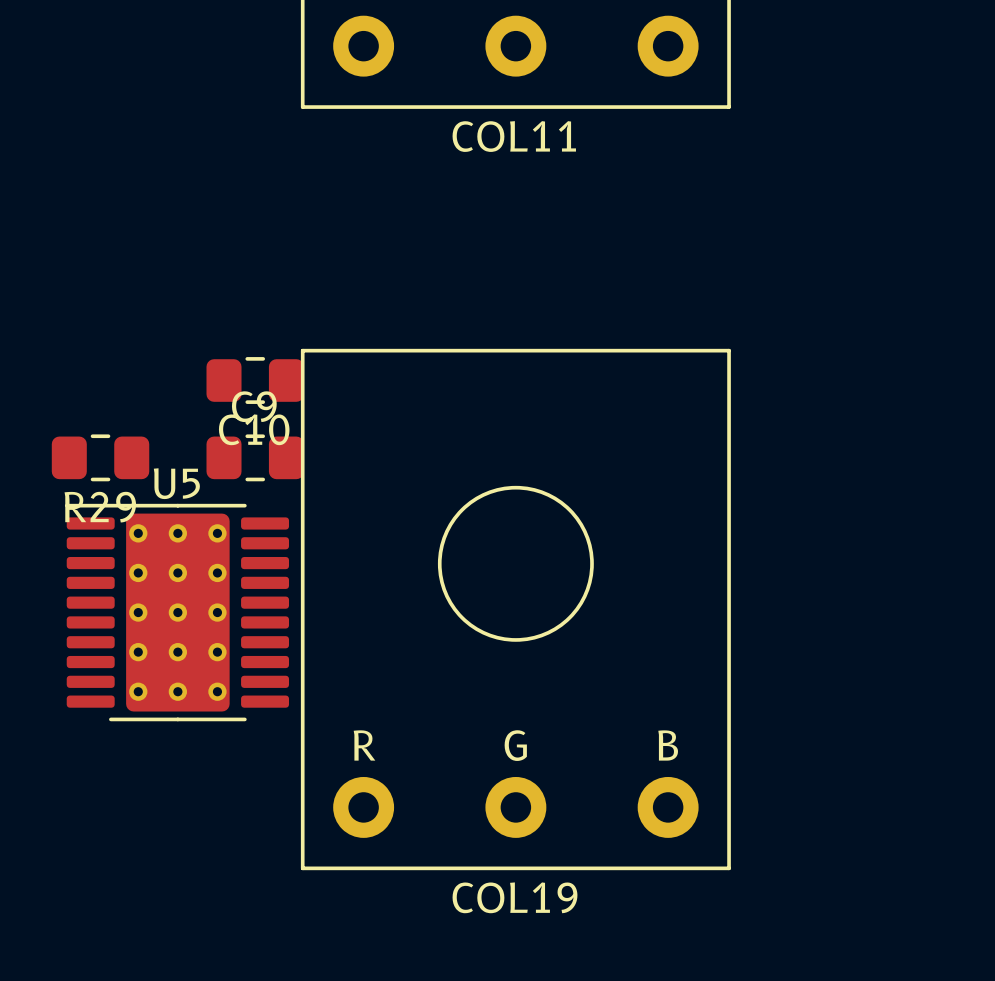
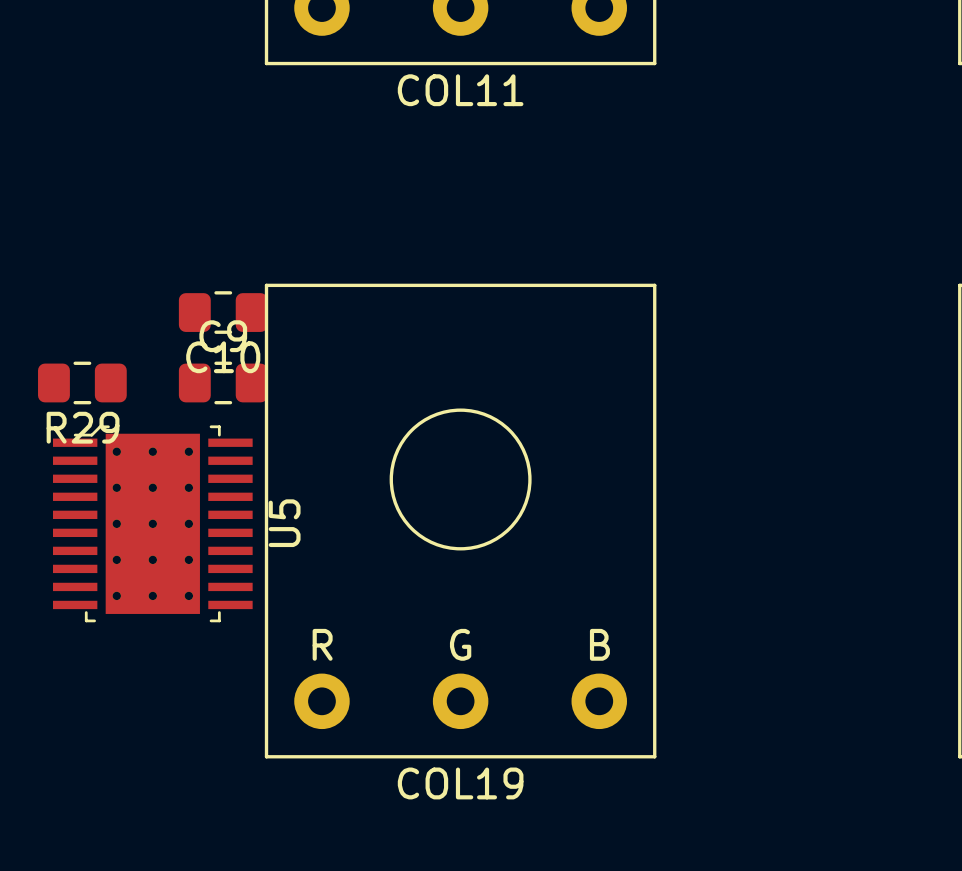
U5 name position: U5 (176, 483) -> U5 (284, 523)
U5 footprint: [64, 503, 290, 722] -> [52, 425, 253, 623]

